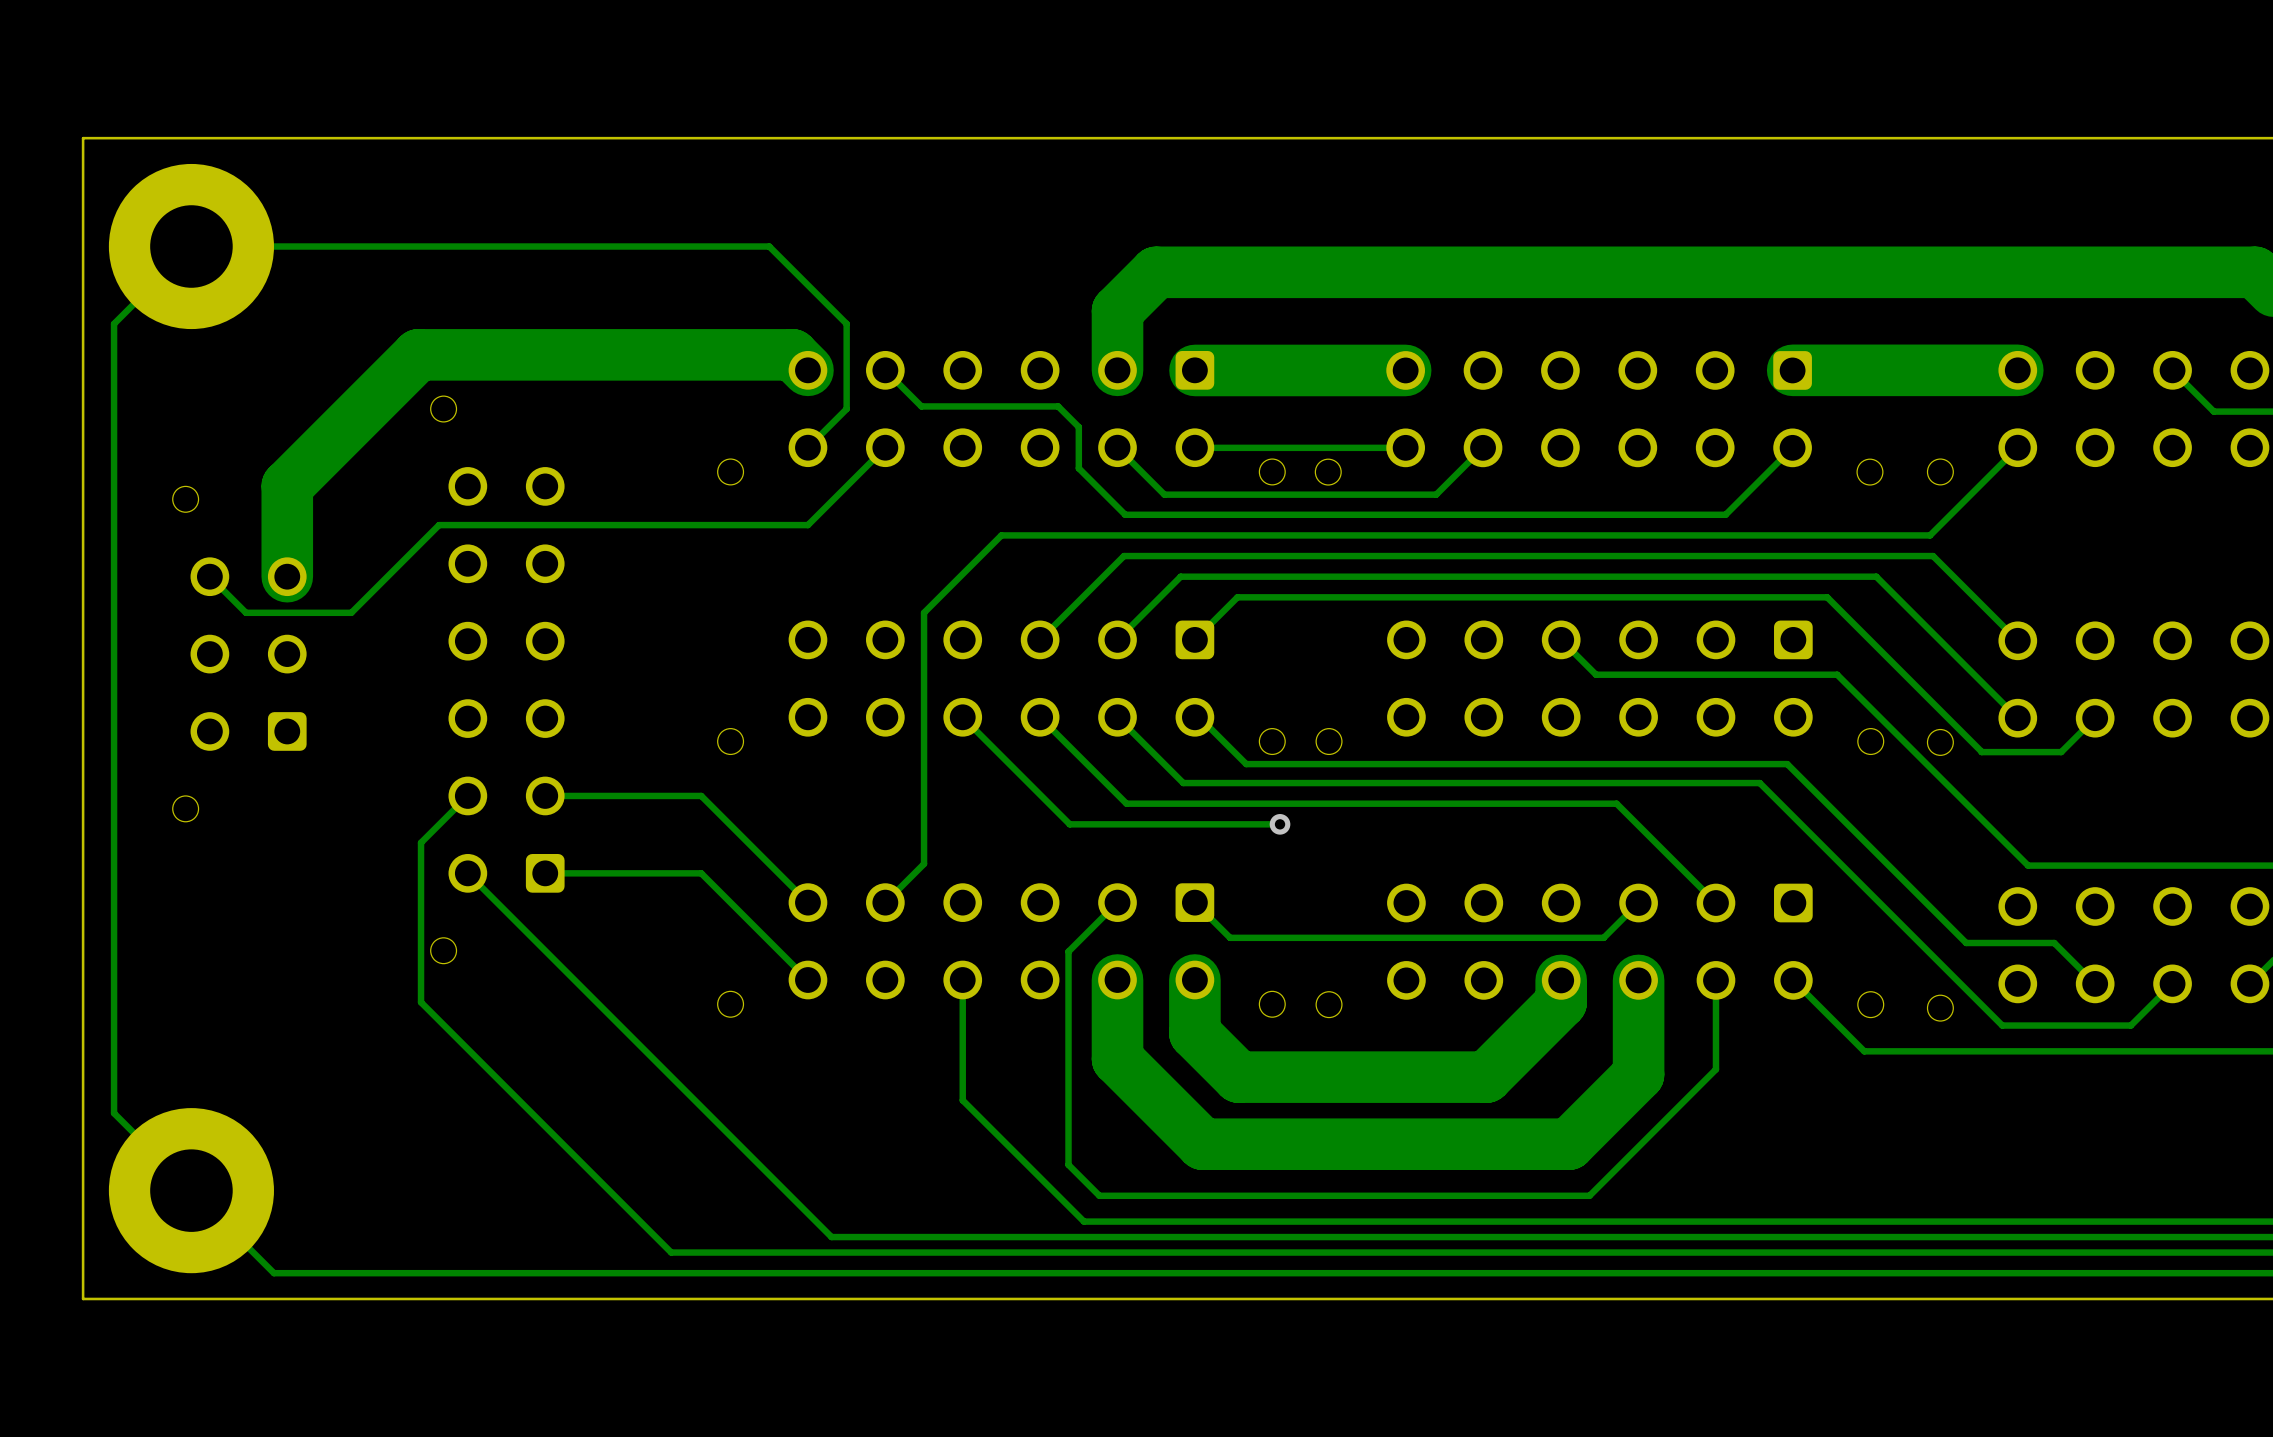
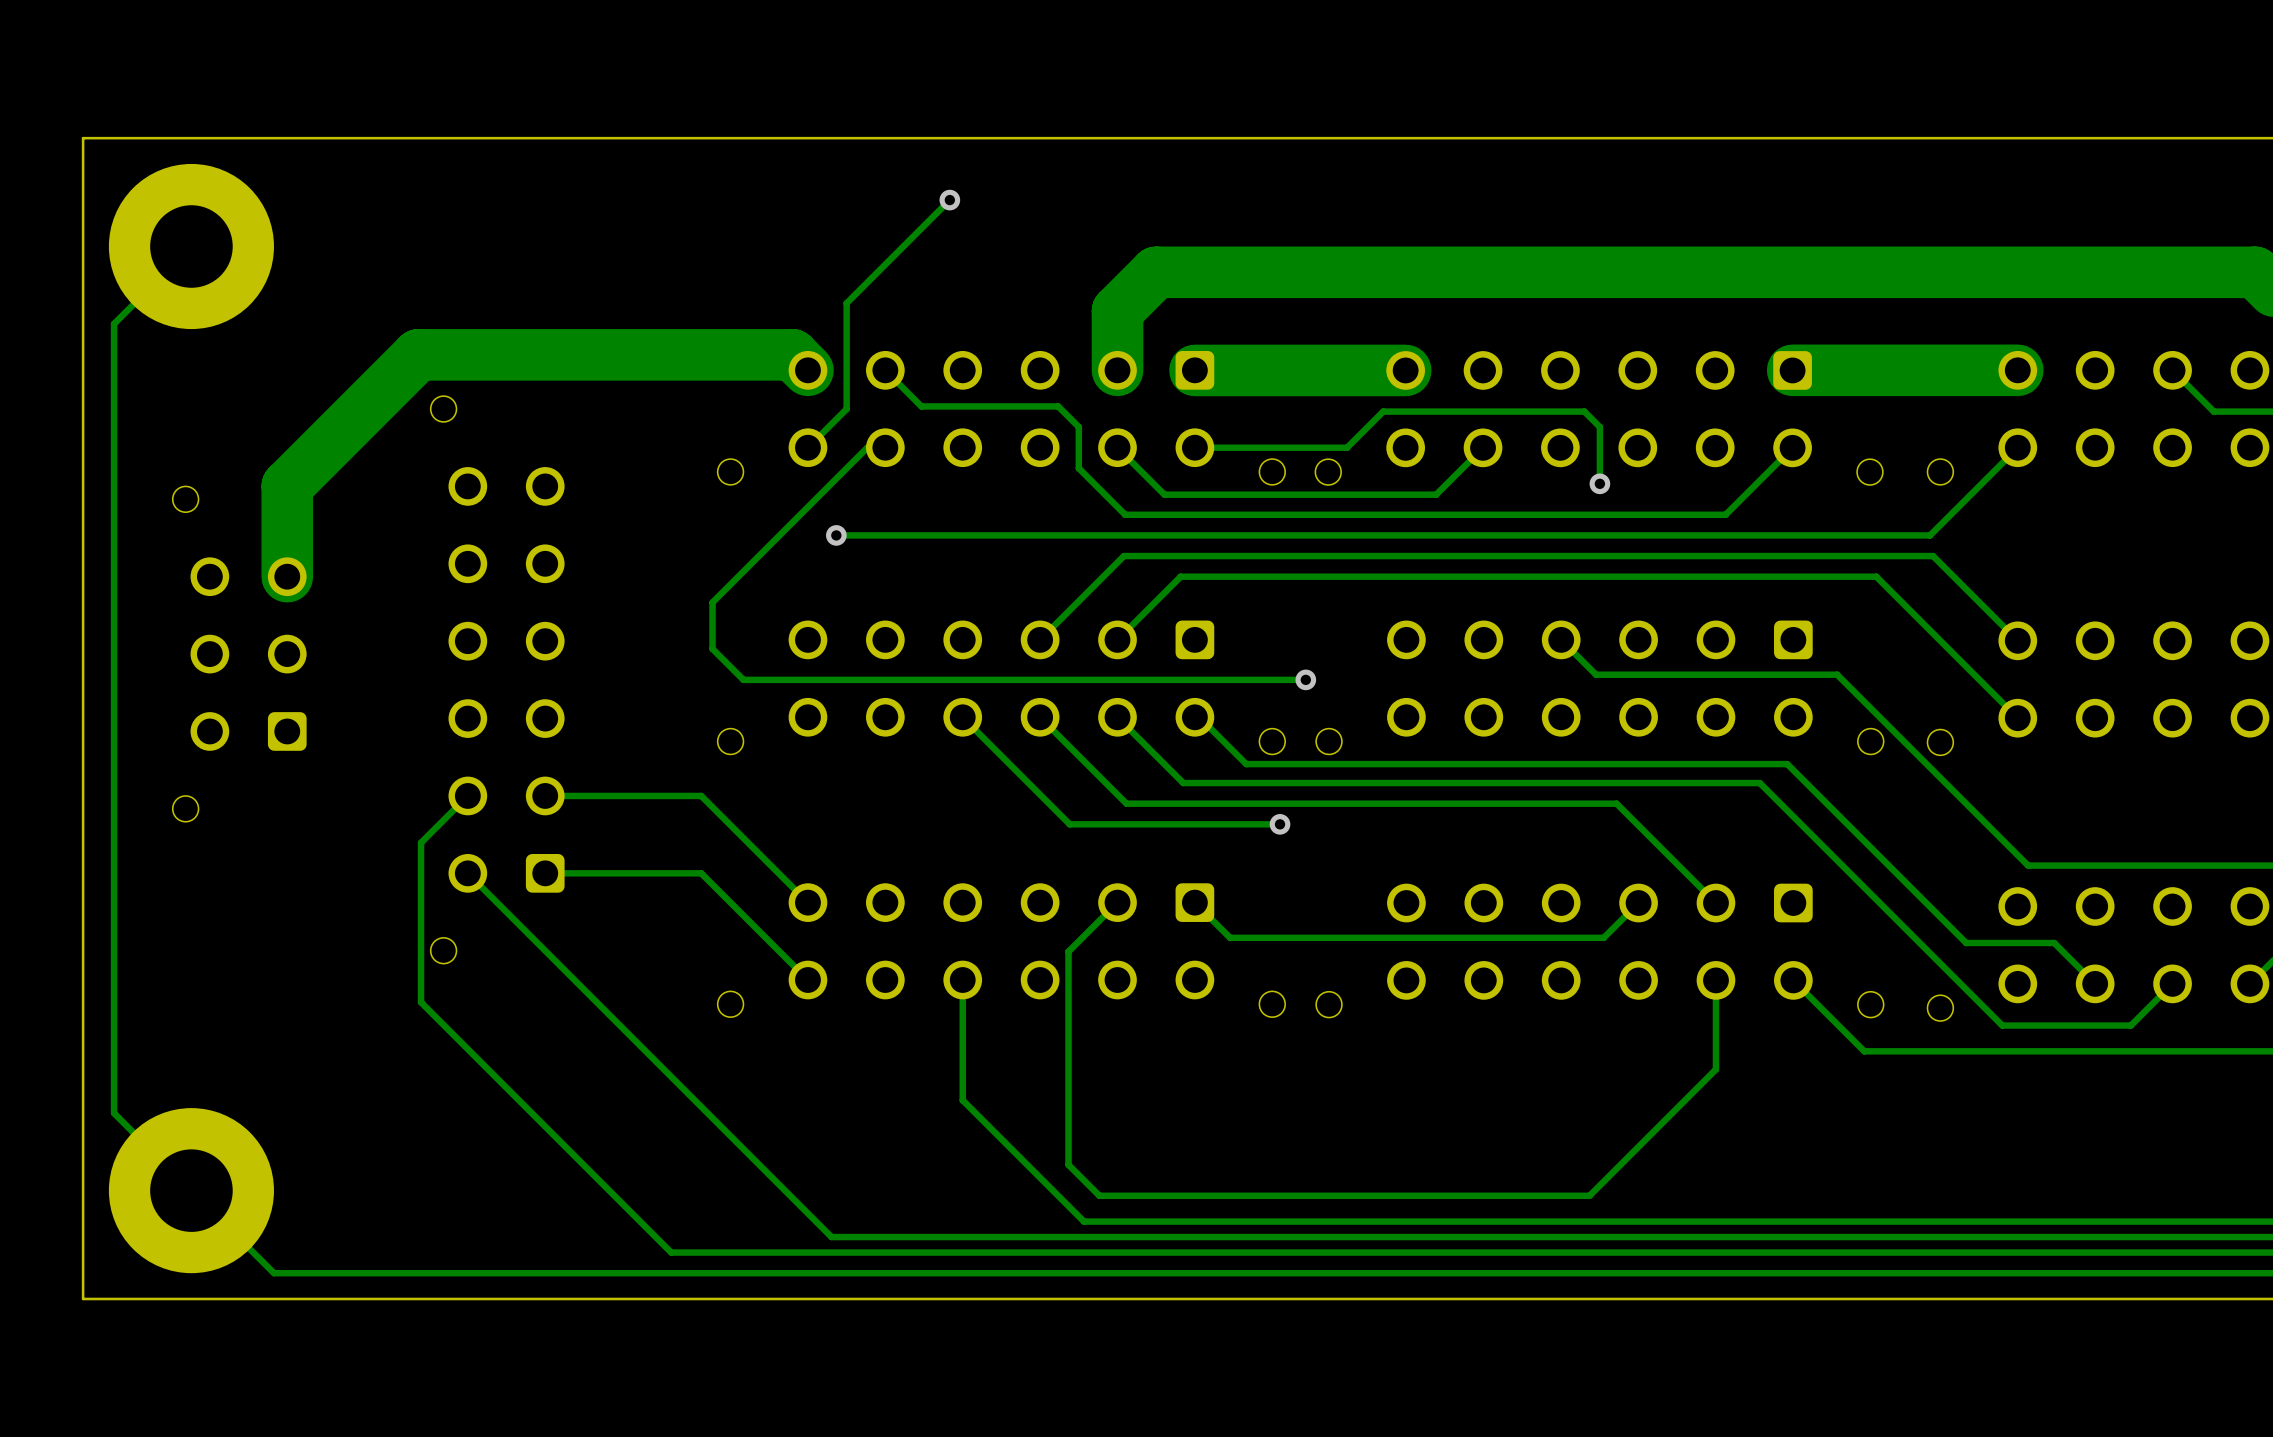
via: none -> (949, 200)
track: (191, 246) (769, 246) (846, 323) -> (949, 200) (846, 303) (846, 323)
track: (885, 447) (807, 525) (439, 525) (351, 612) (246, 612) (209, 576) -> (885, 447) (867, 447) (712, 602) (712, 648) (743, 679) (1305, 679)
track: (1405, 447) (1195, 447) -> (1599, 483) (1599, 427) (1584, 411) (1383, 411) (1347, 447) (1194, 447)
via: none -> (1599, 483)
via: none -> (836, 535)
track: (1001, 535) (924, 612) (924, 863) (885, 902) -> (1001, 535) (836, 535)
track: (1194, 639) (1237, 597) (1827, 597) (1981, 751) -> none
via: none -> (1305, 679)
track: (2095, 718) (2061, 752) (1981, 752) -> none
track: (1117, 980) (1117, 1059) (1202, 1144) (1568, 1144) (1638, 1074) (1638, 980) -> none
track: (1194, 980) (1194, 1033) (1238, 1077) (1486, 1077) (1561, 1002) (1561, 980) -> none

